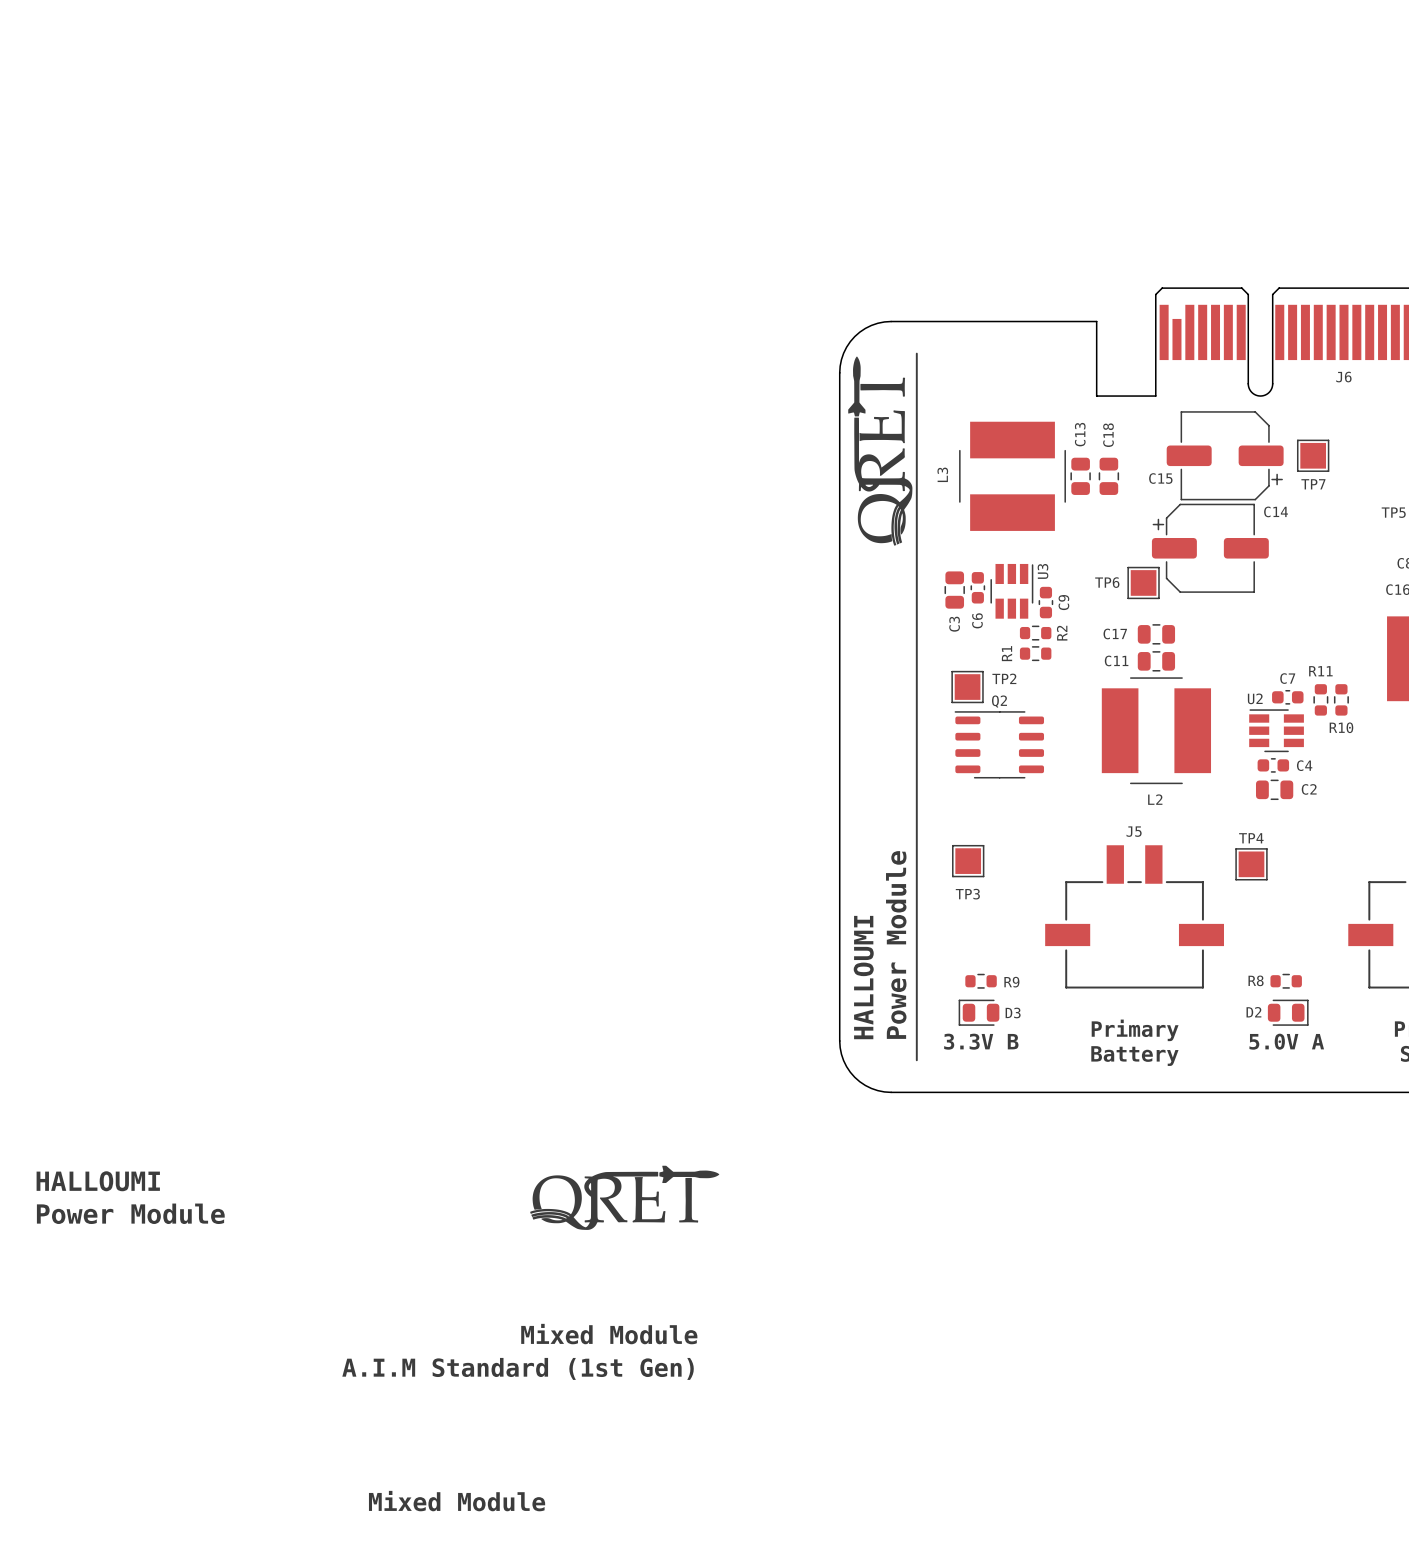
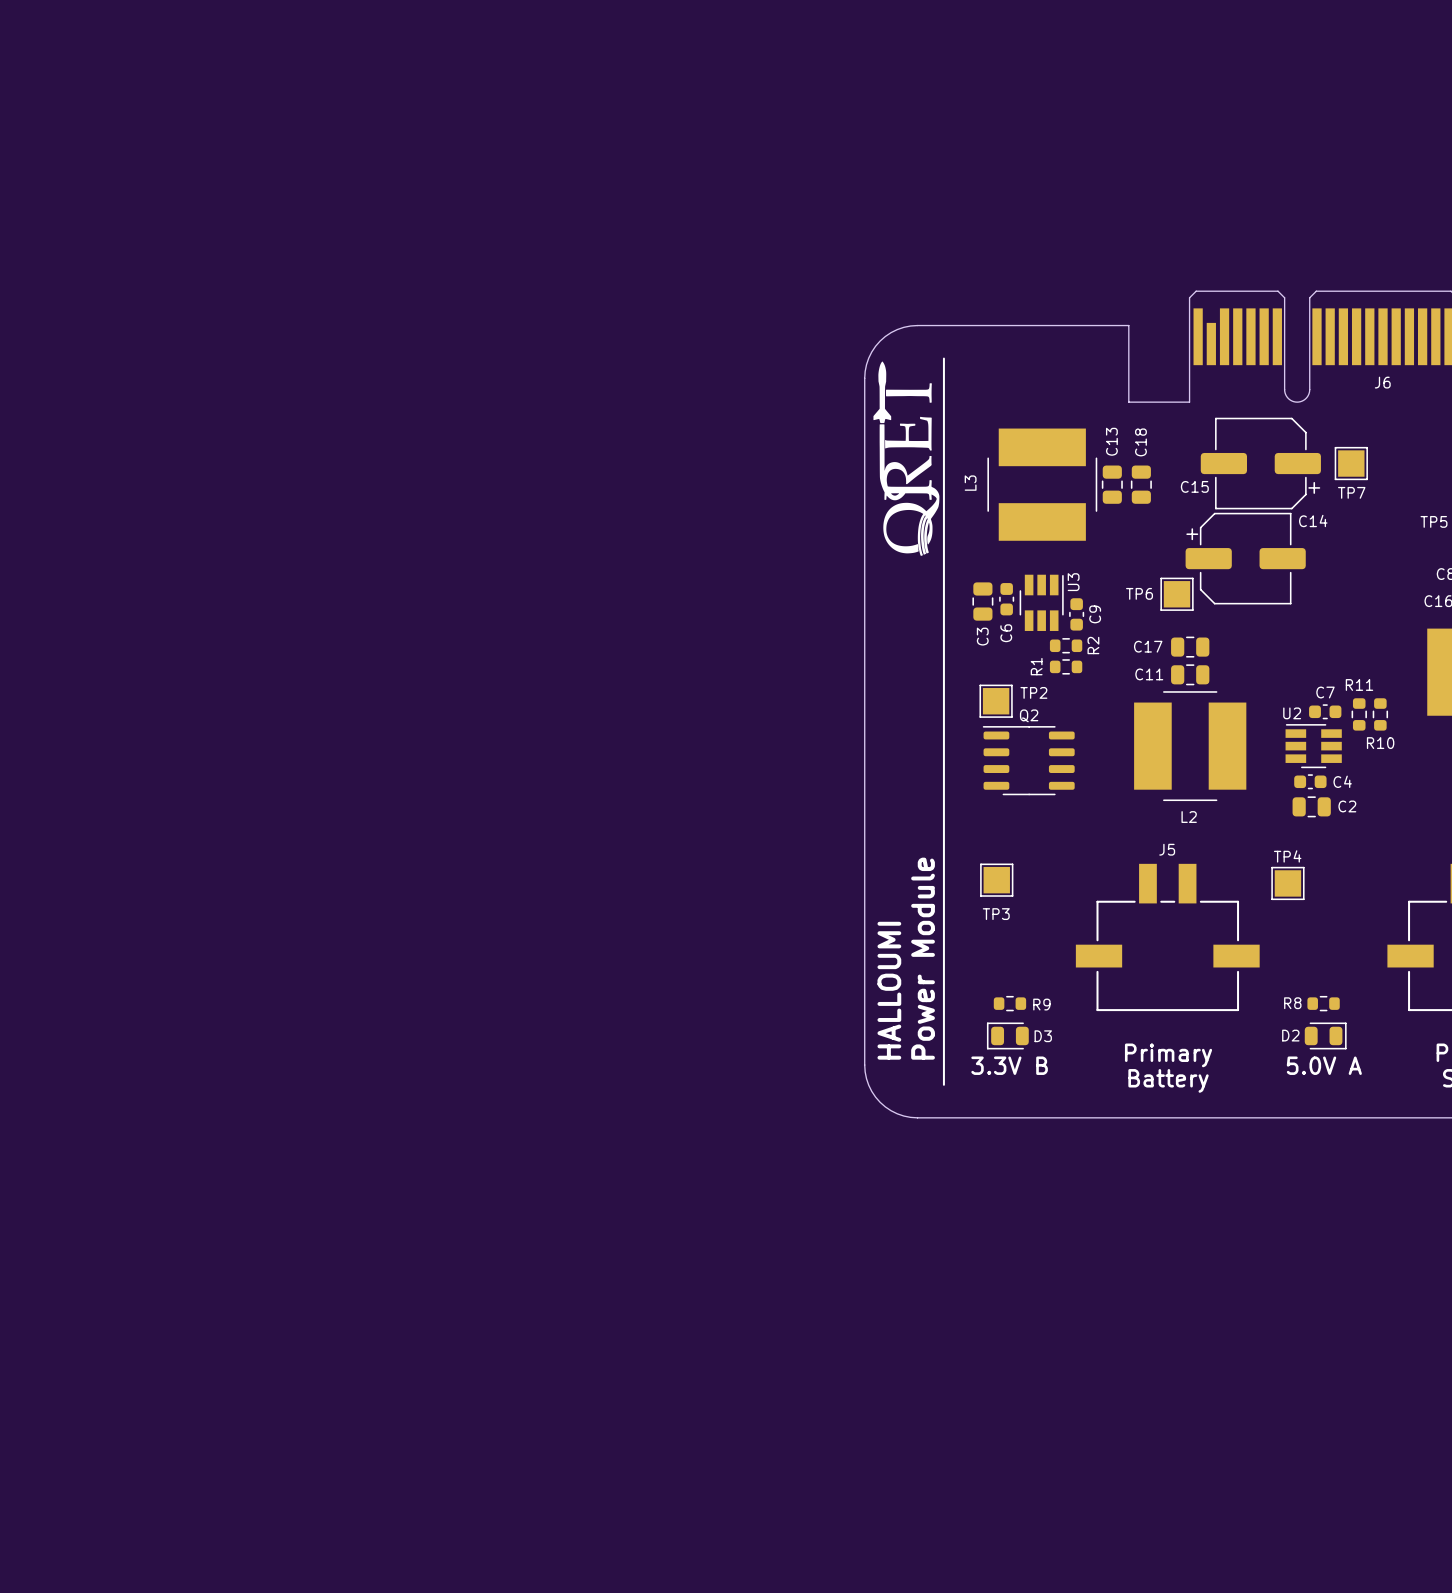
drawing: [530, 1165, 720, 1230] -> none
text: HALLOUMI (98, 1181) -> none
text: Power Module (130, 1213) -> none
text: Mixed Module (609, 1334) -> none
text: A.I.M Standard (1st Gen) (518, 1368) -> none
text: Mixed Module (457, 1501) -> none

